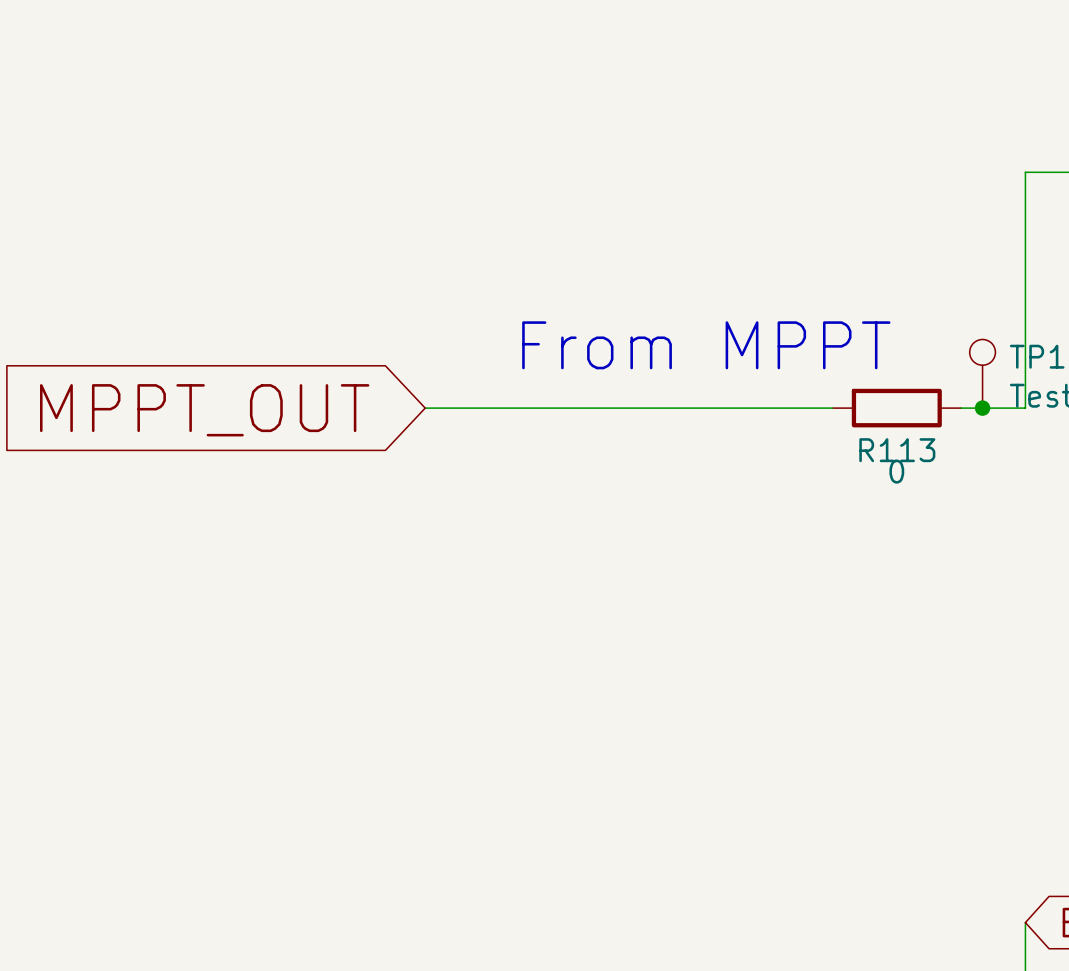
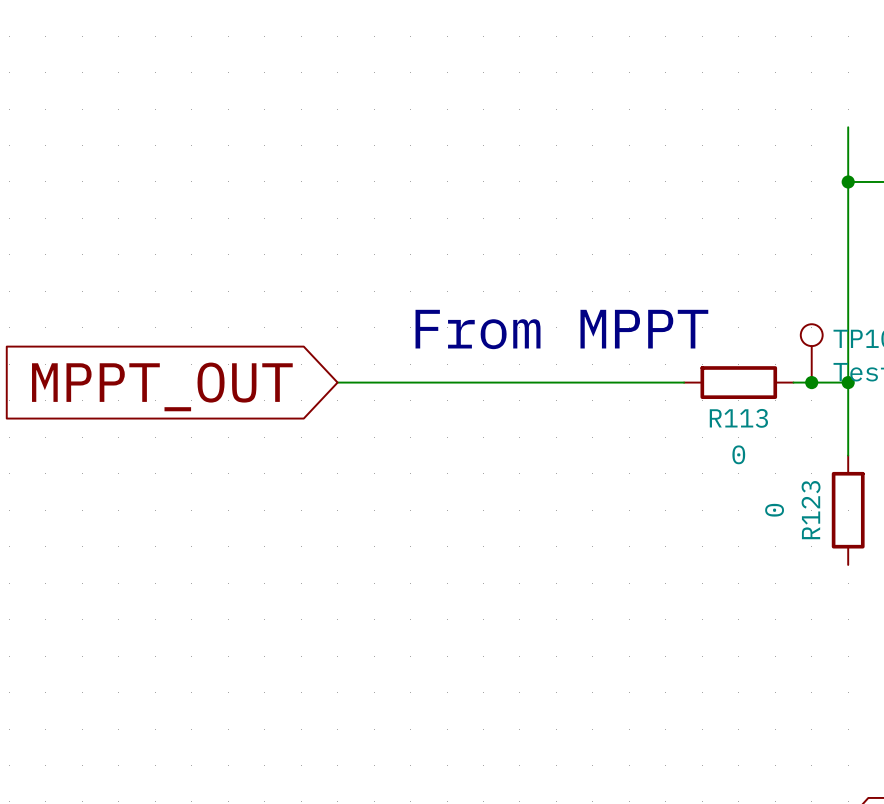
wire: none -> (848, 127) (848, 181)
junction: none -> (848, 181)
wire: none -> (848, 382) (848, 455)
junction: none -> (848, 382)
R113 value position: 0 (896, 471) -> 0 (738, 454)
R123: none -> 0 (848, 510)

